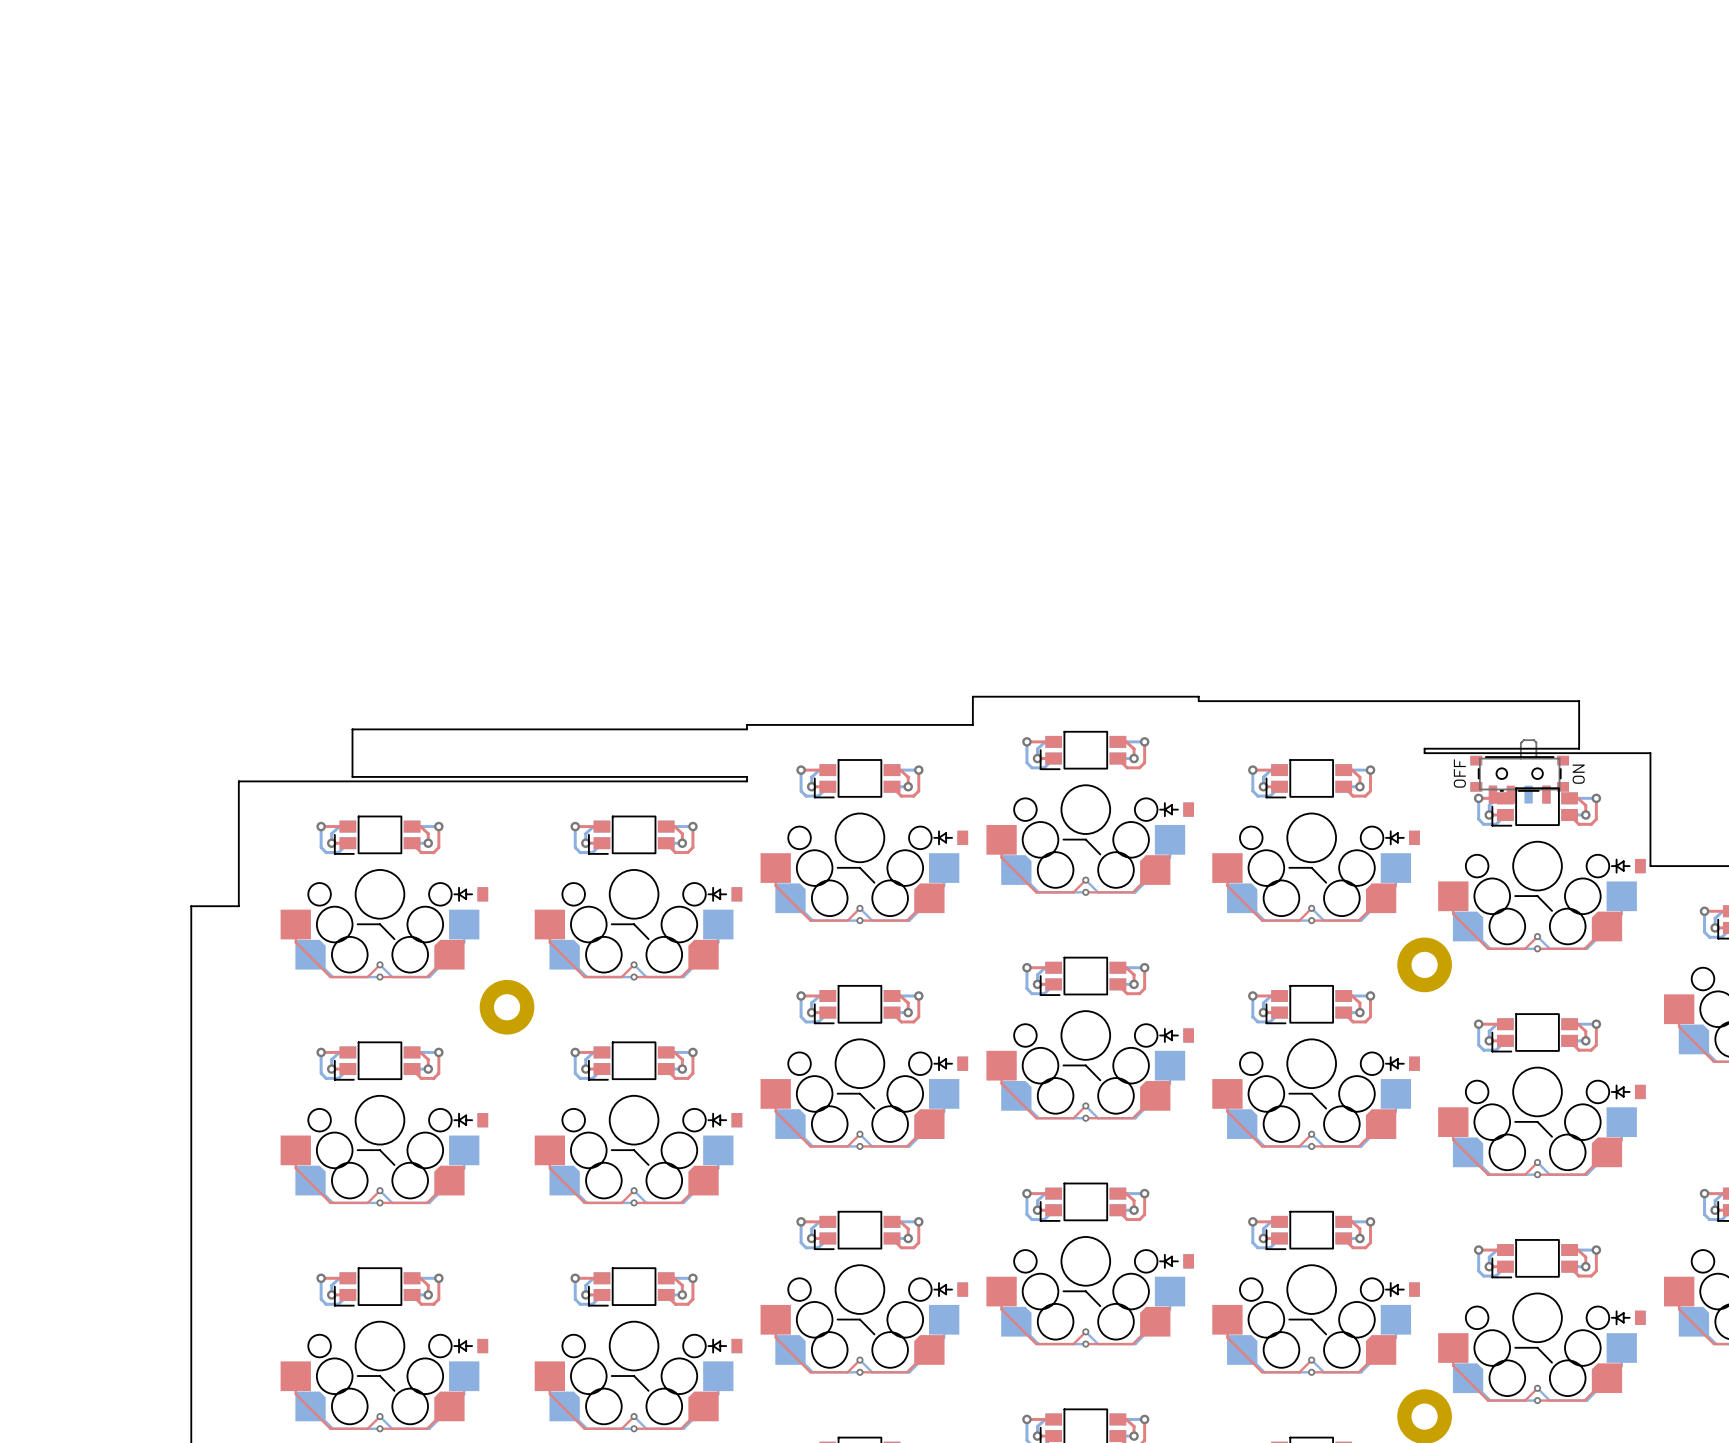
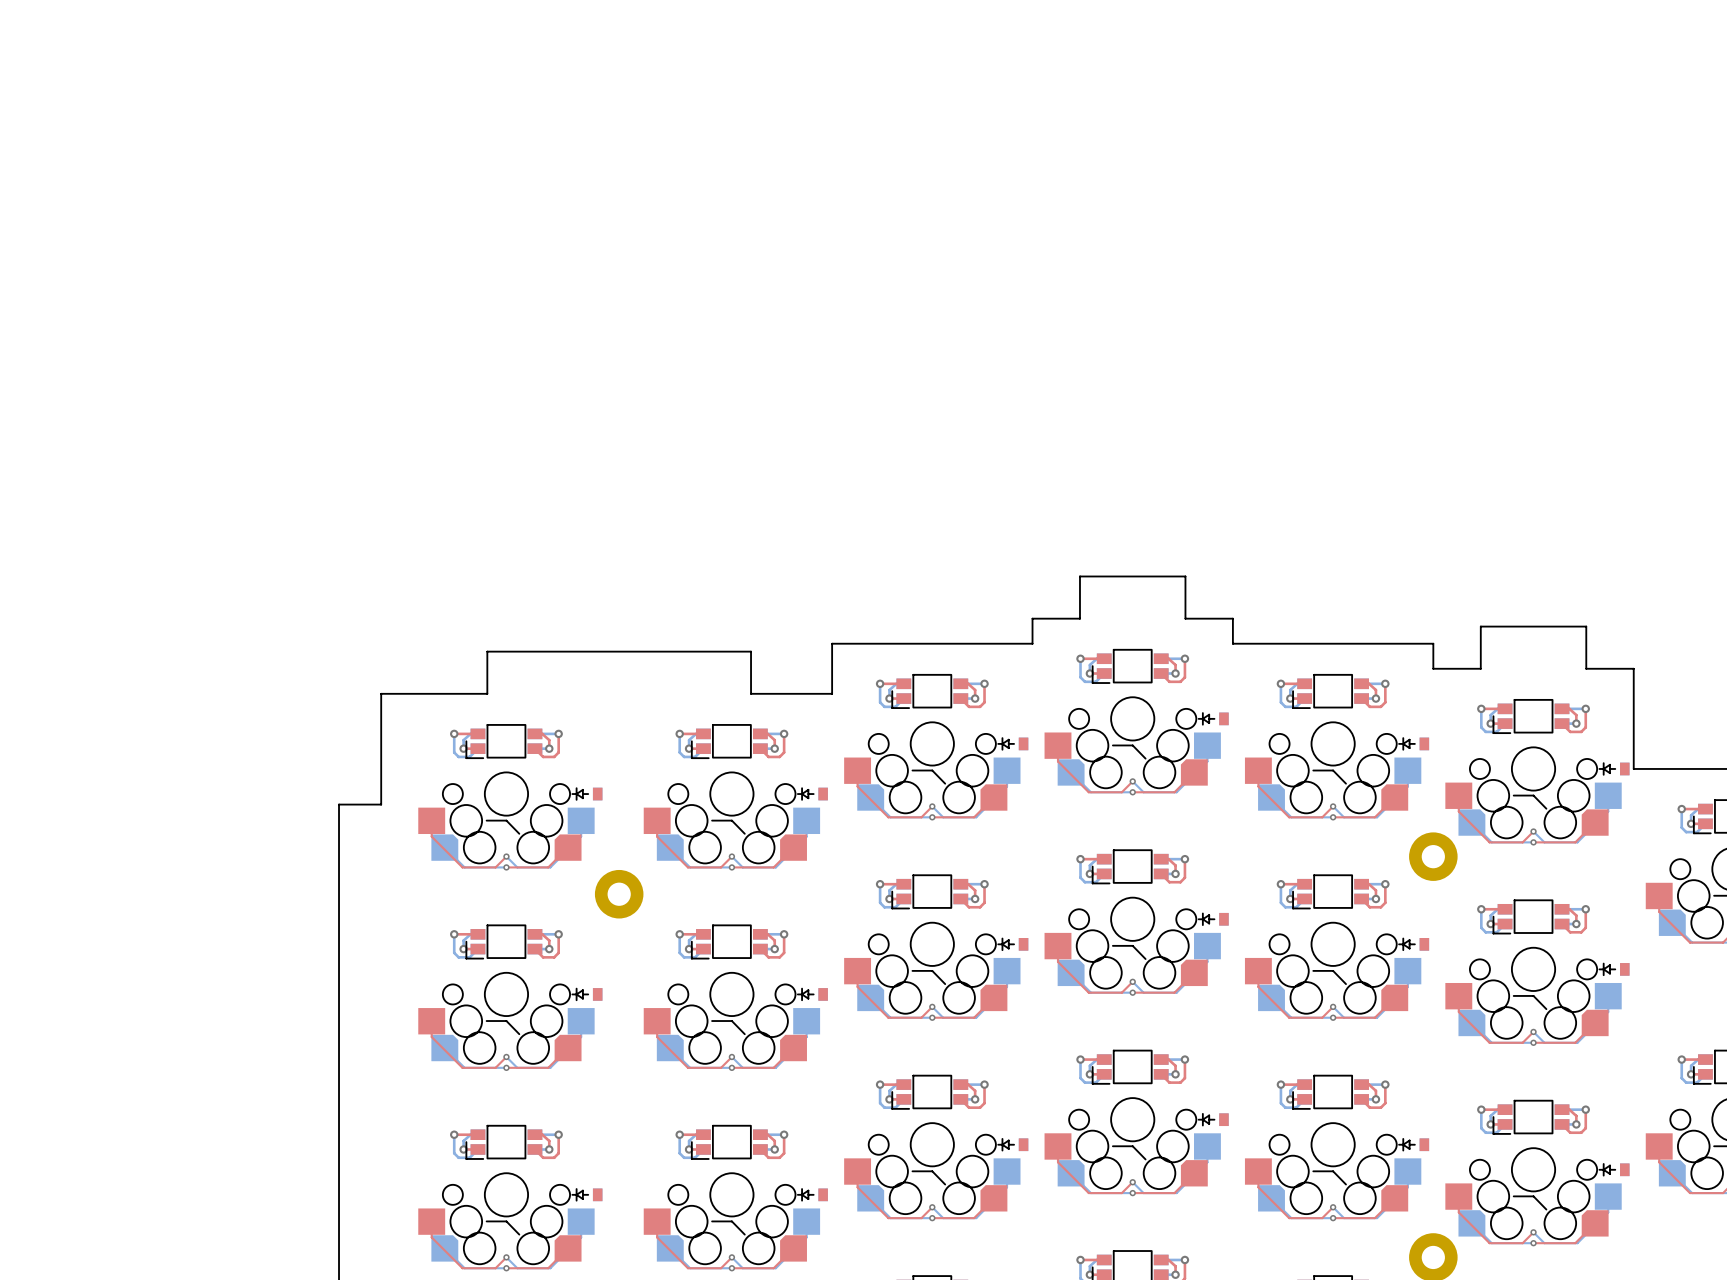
board edge: (1026, 696) (1145, 696) -> (1079, 618) (1079, 576) (1185, 576) (1185, 618)
board edge: (1198, 701) (1579, 701) (1579, 748) (1424, 748) -> (1232, 622) (1232, 643) (1433, 643) (1433, 664)
board edge: (747, 729) (352, 729) (352, 776) (747, 776) -> (832, 647) (832, 689)
board edge: (1478, 753) (1596, 753) -> (1480, 668) (1480, 626) (1586, 626) (1586, 668)
part: (1519, 771) -> none
board edge: (358, 781) (655, 781) -> (487, 693) (487, 651) (751, 651) (751, 693)

